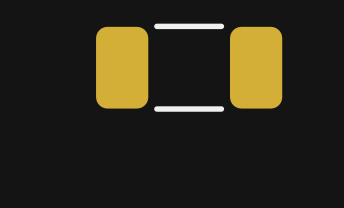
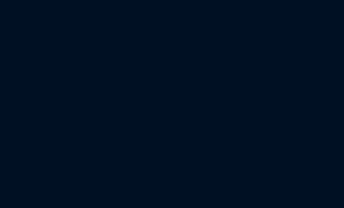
part: (189, 67) -> none

